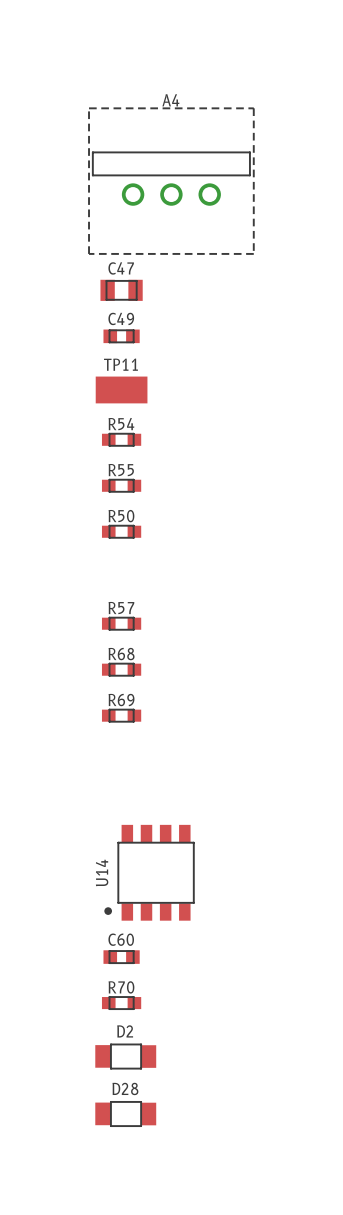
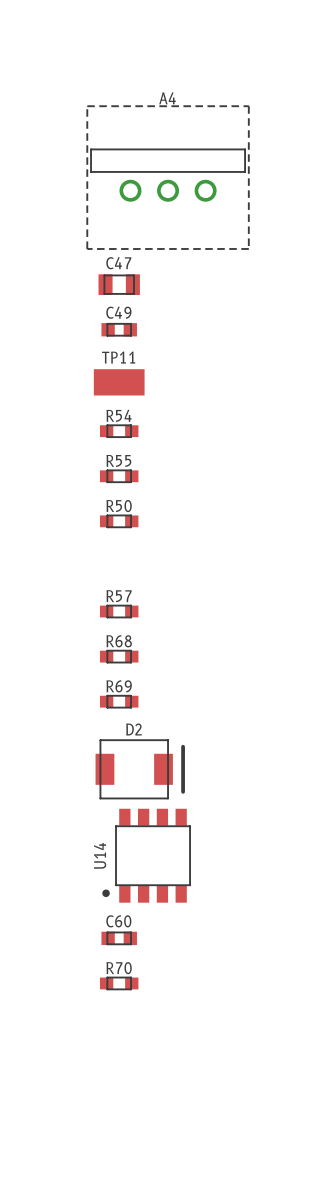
D2 footprint: [95, 1043, 157, 1070] -> [95, 739, 185, 800]
D28: (125, 1114) -> none

